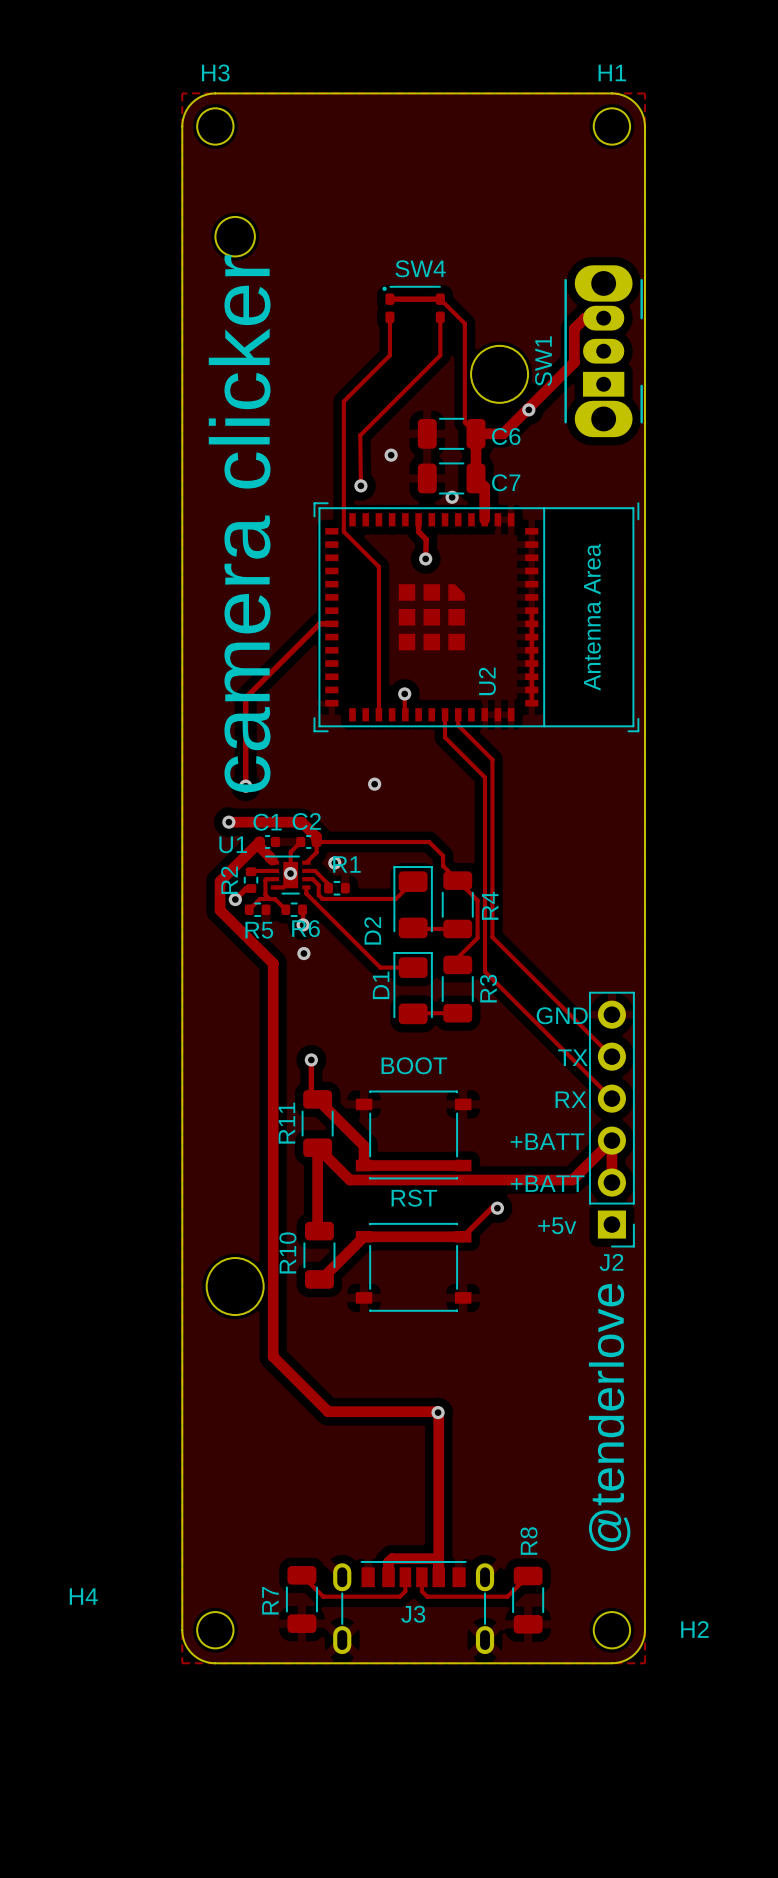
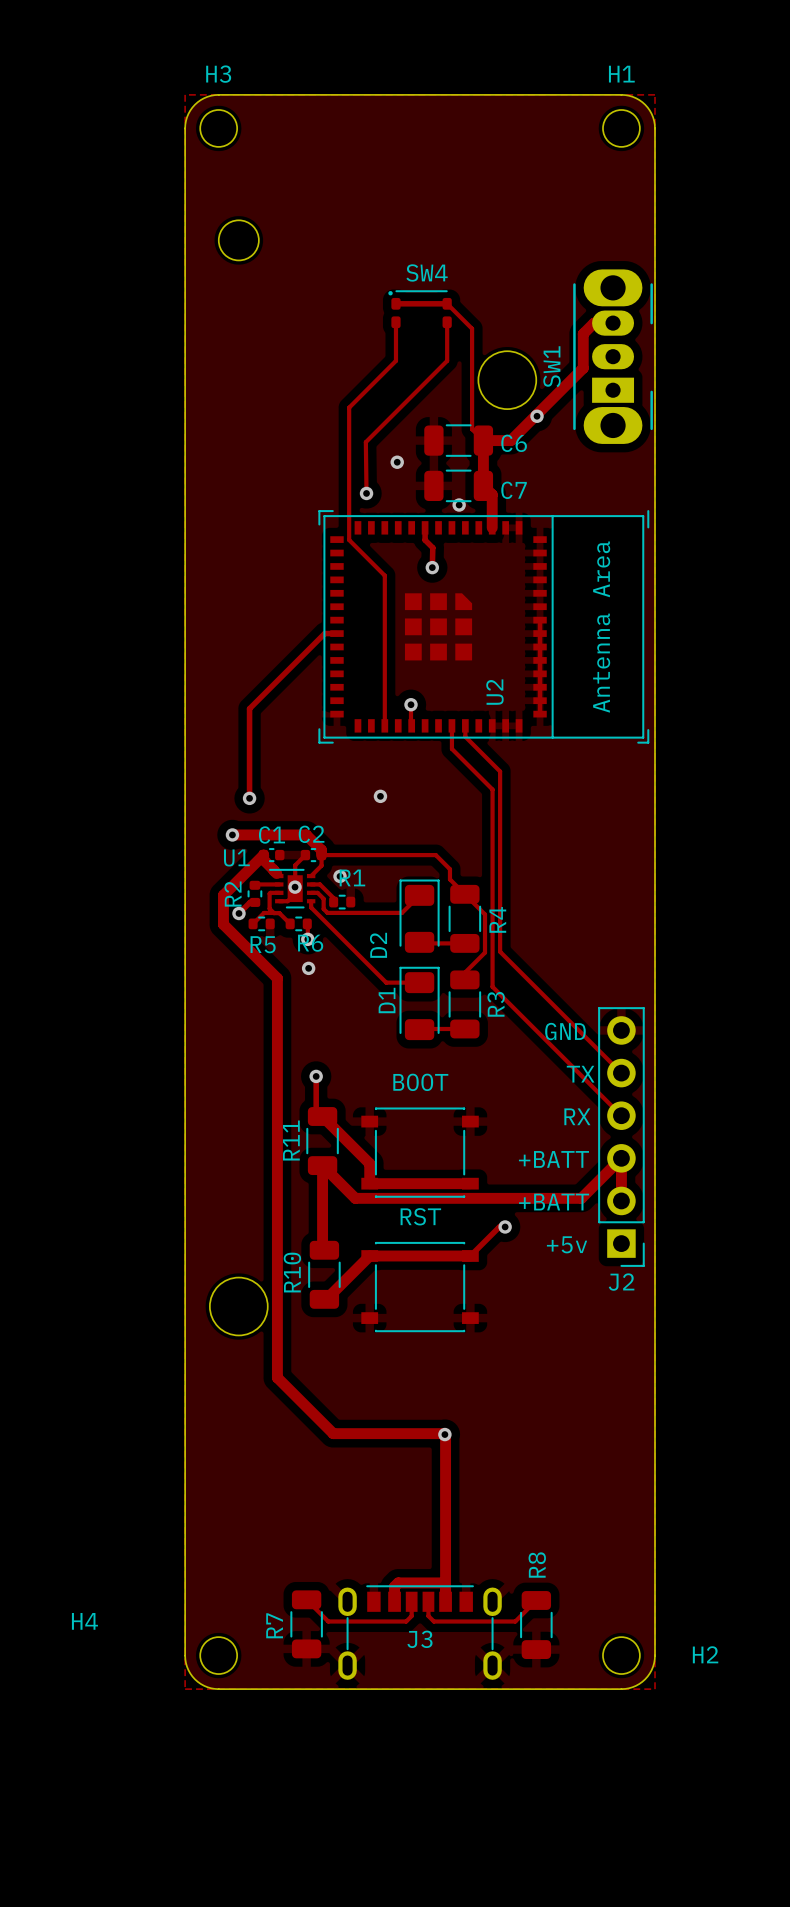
text: camera clicker (239, 523) -> none
text: @tenderlove (609, 1417) -> none

